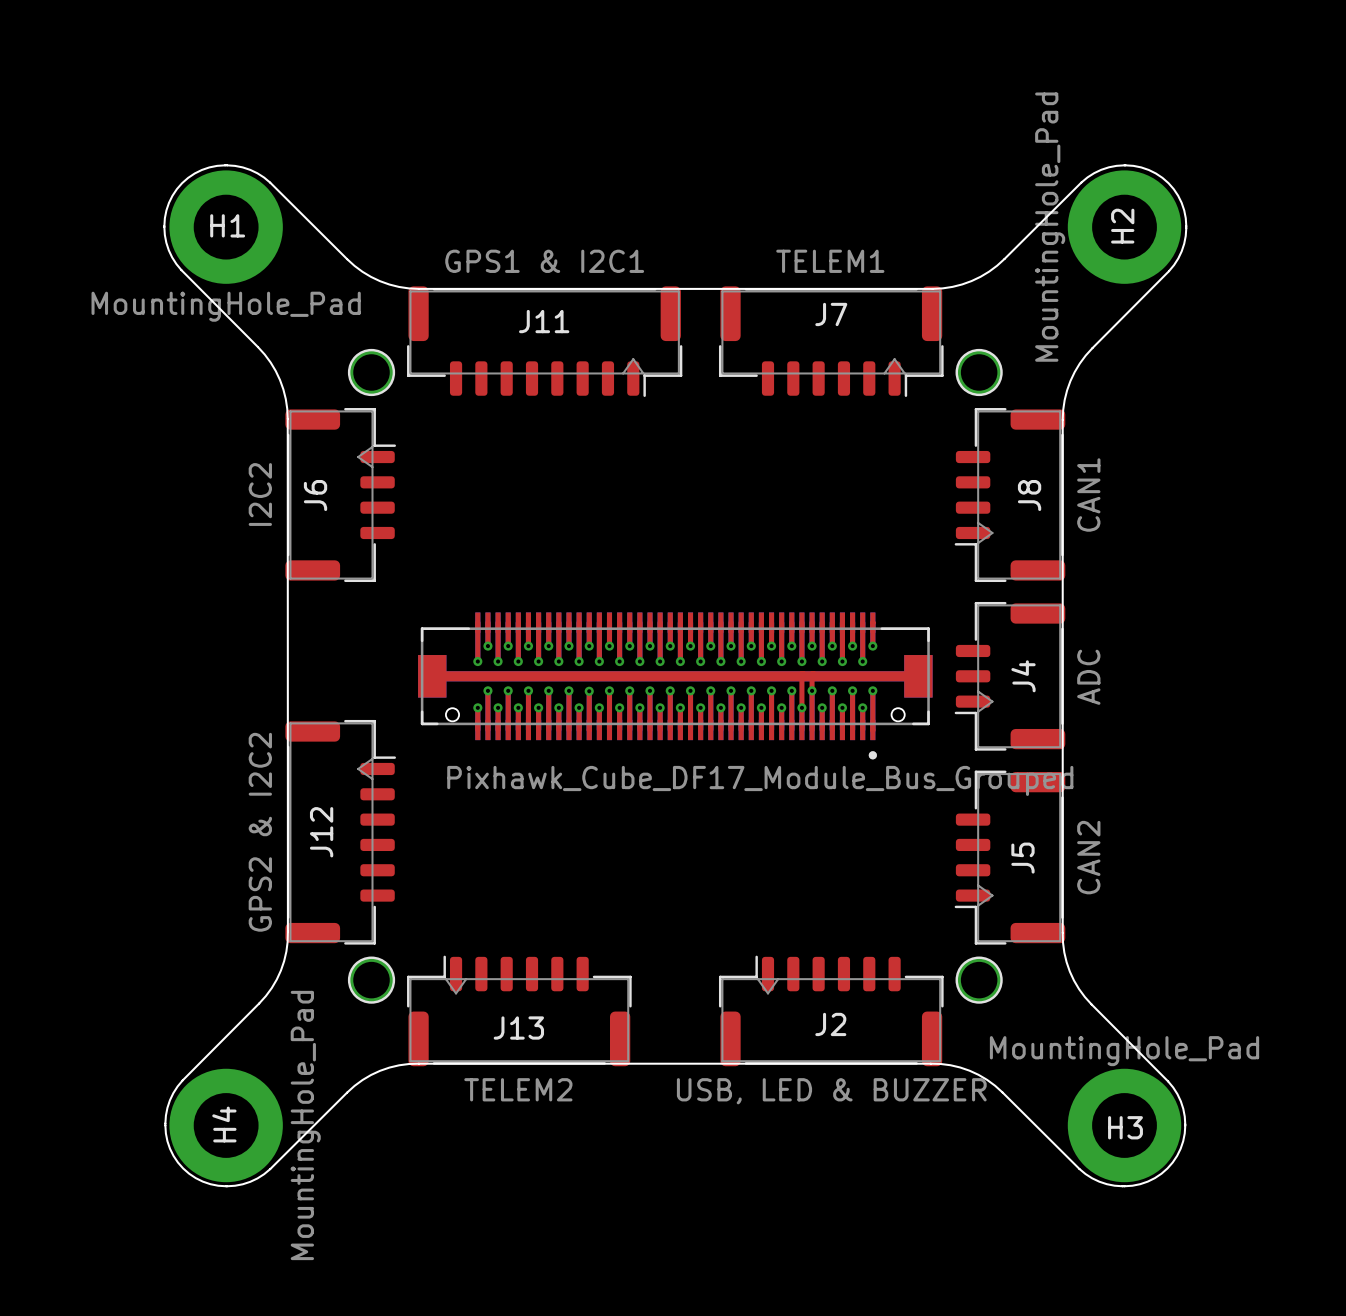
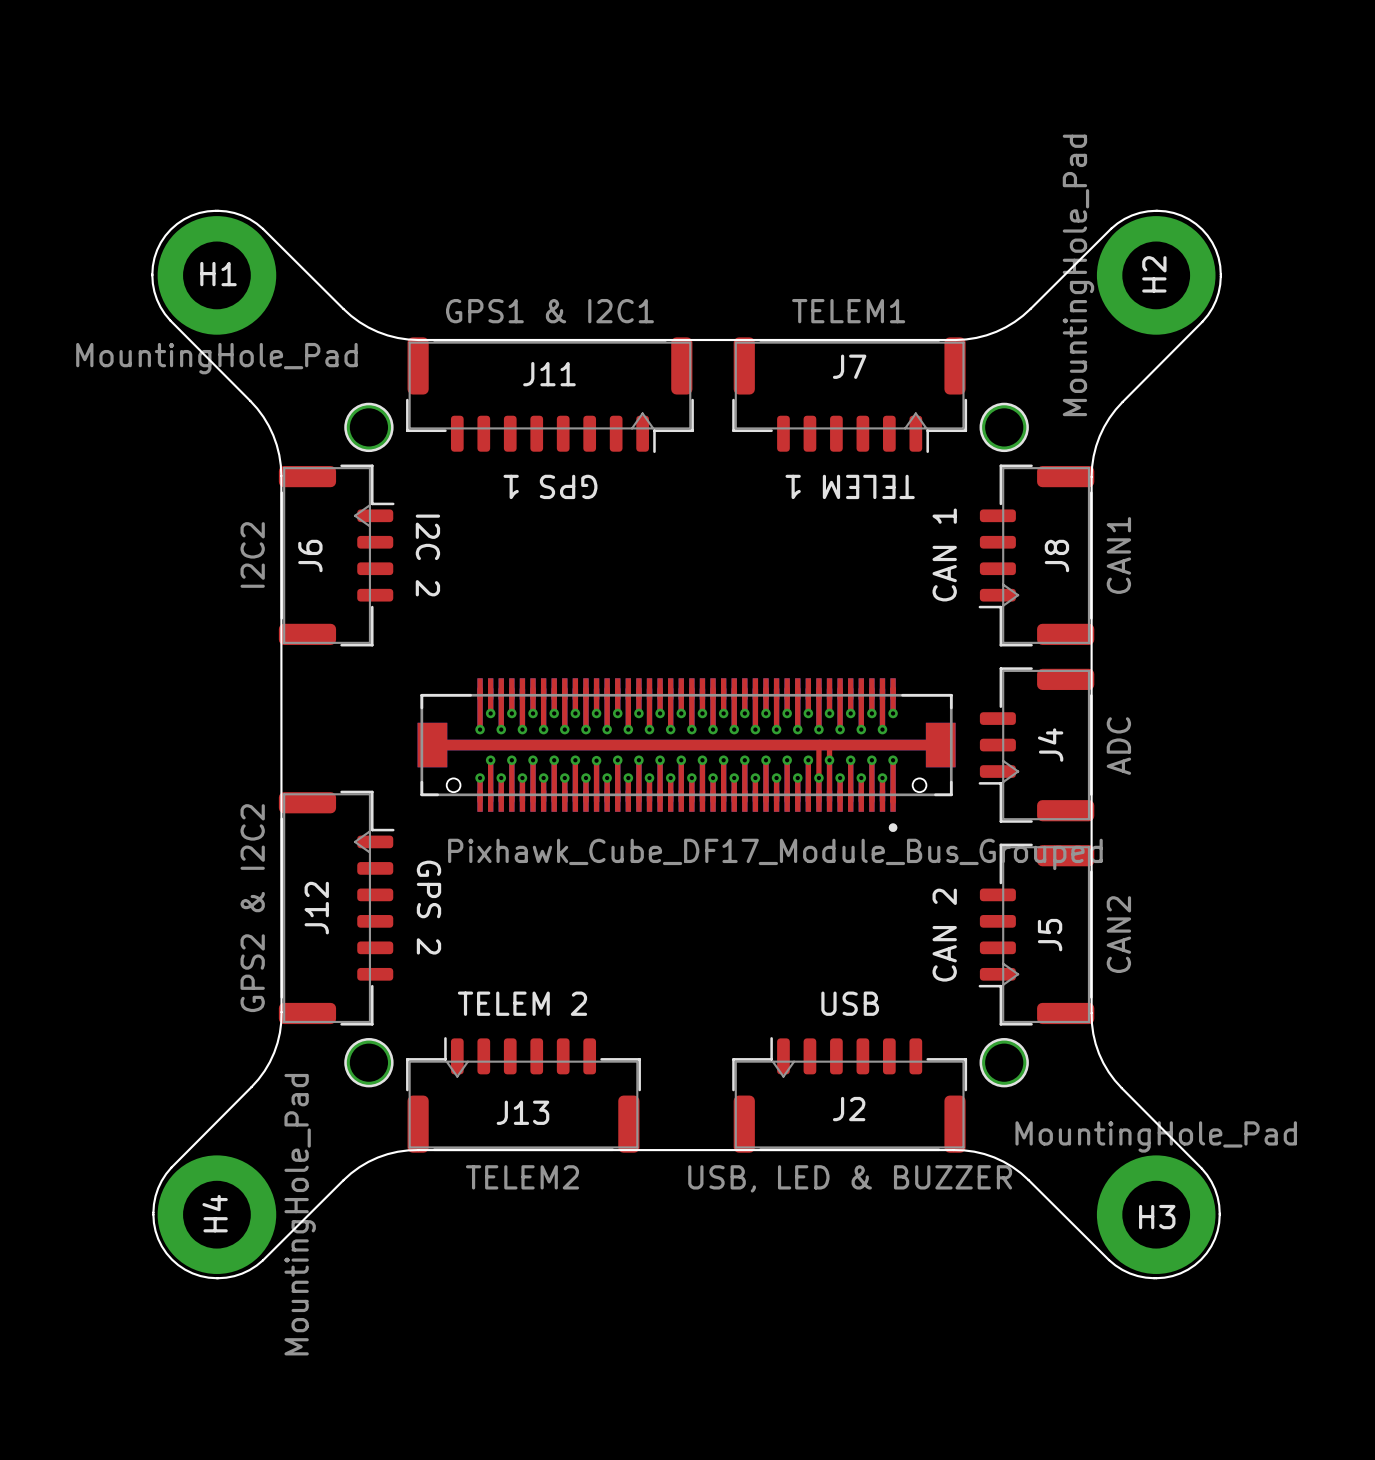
text: none -> GPS 1 (550, 486)
text: none -> TELEM 1 (850, 486)
text: none -> I2C 2 (427, 555)
text: none -> CAN 1 (944, 554)
text: none -> GPS 2 (428, 907)
text: none -> CAN 2 (944, 935)
text: none -> TELEM 2 (522, 1003)
text: none -> USB (850, 1003)

